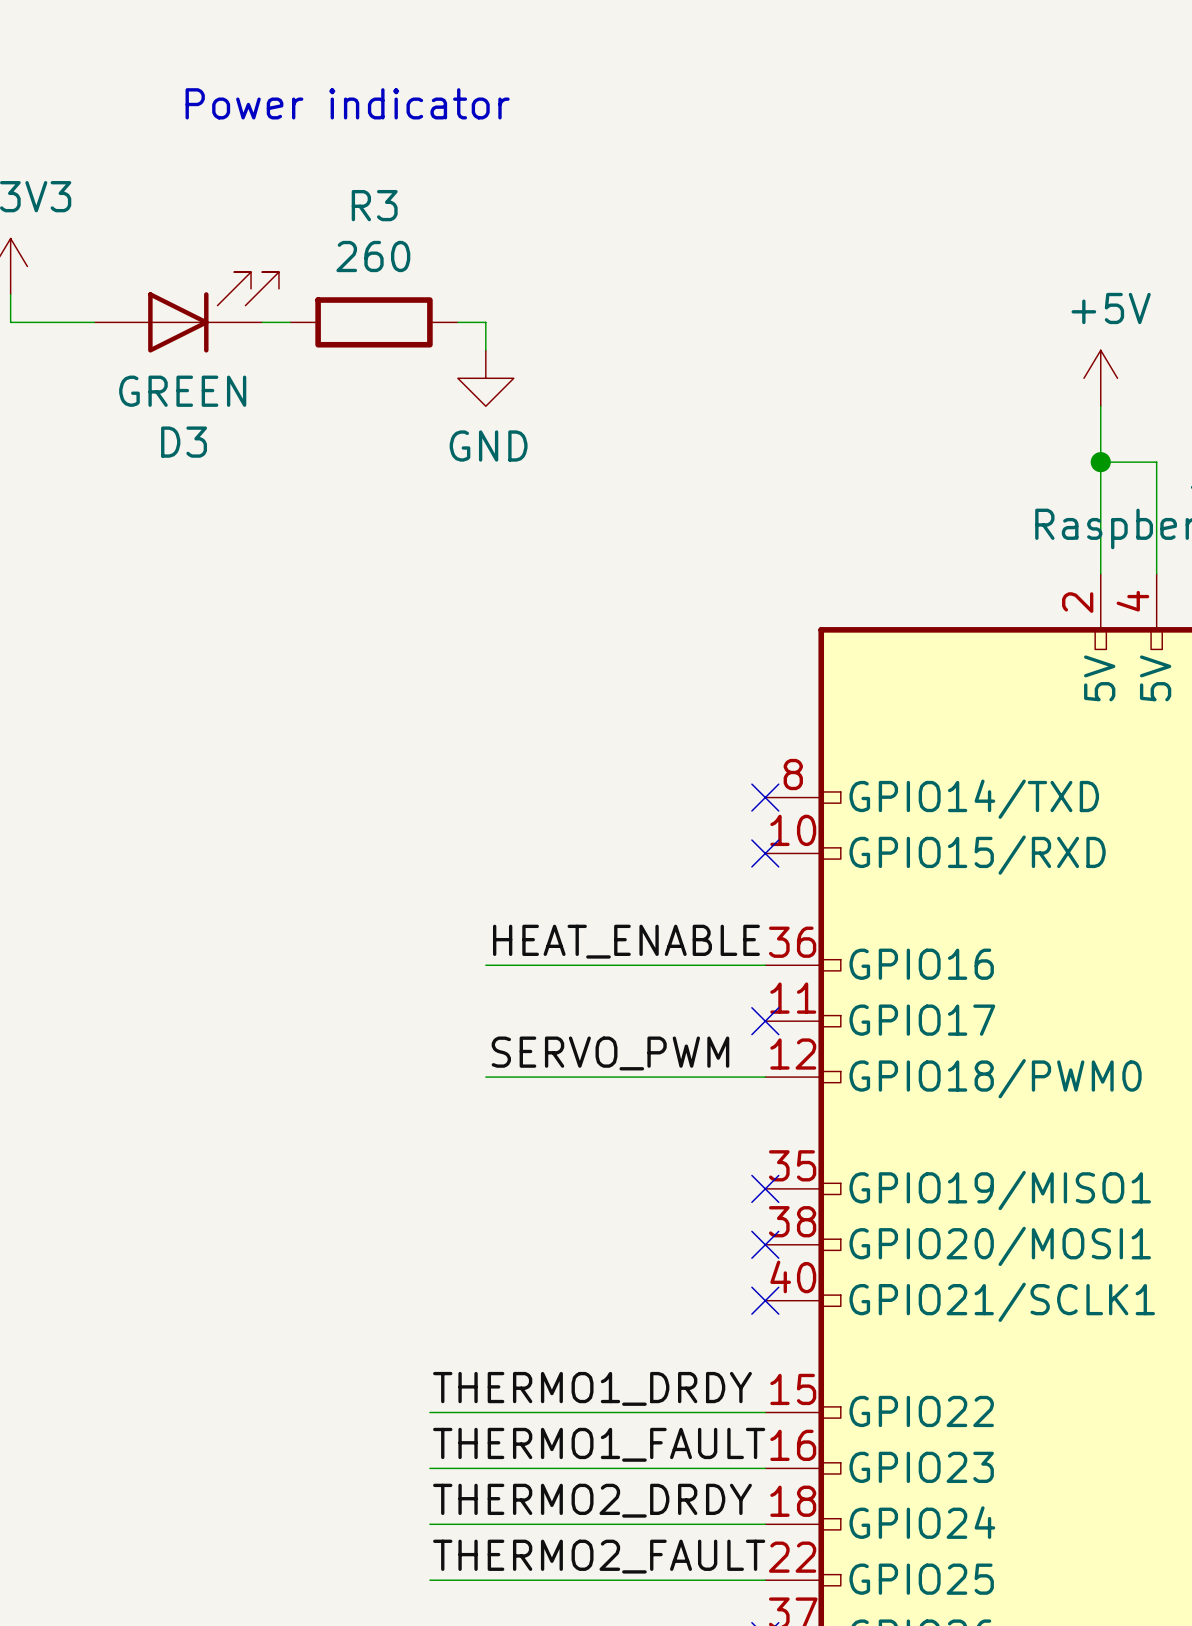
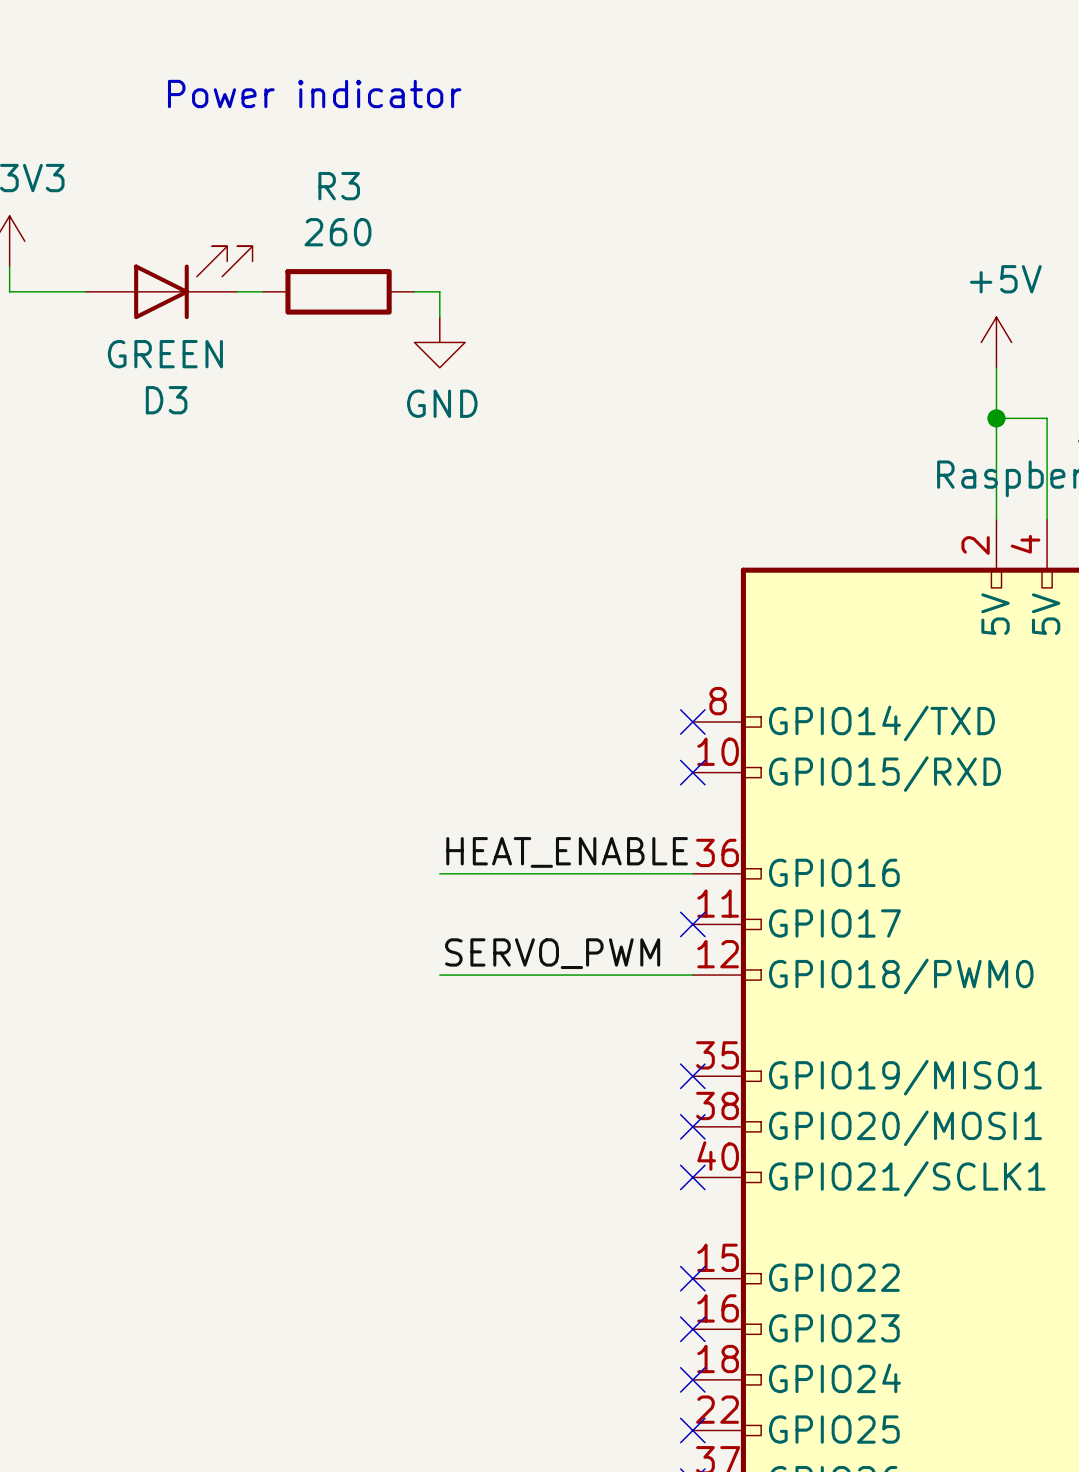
label: THERMO1_DRDY (592, 1388) -> none
wire: (429, 1412) (765, 1412) -> none
no-connect mark: none -> (692, 1278)
label: THERMO1_FAULT (599, 1444) -> none
wire: (429, 1468) (765, 1468) -> none
no-connect mark: none -> (692, 1329)
label: THERMO2_DRDY (592, 1500) -> none
wire: (429, 1524) (765, 1524) -> none
no-connect mark: none -> (692, 1379)
label: THERMO2_FAULT (599, 1556) -> none
wire: (429, 1580) (765, 1580) -> none
no-connect mark: none -> (692, 1430)

